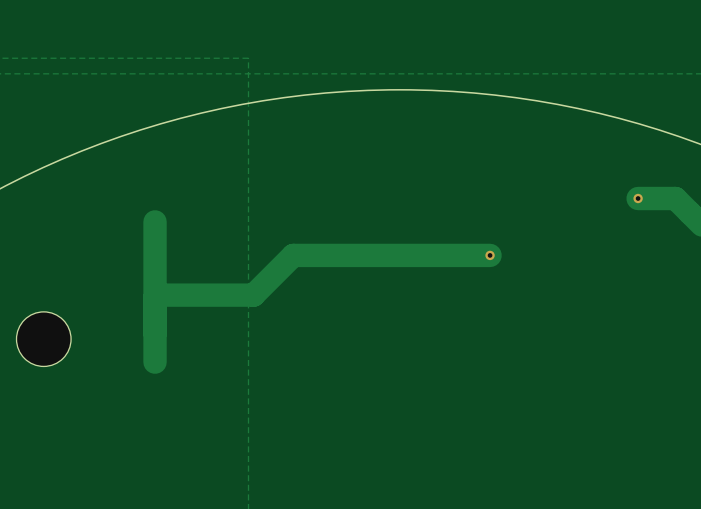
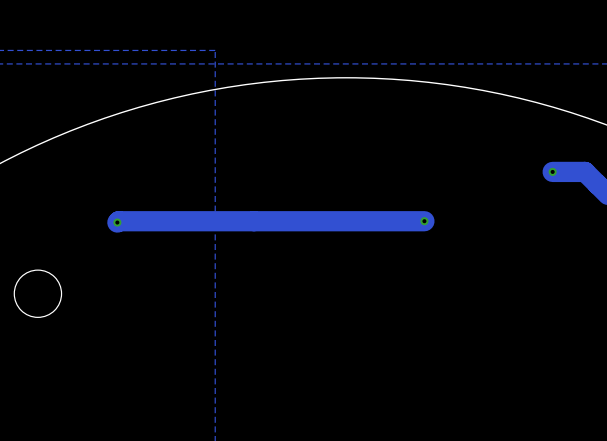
track: (155, 221) (155, 362) -> none
track: (293, 255) (253, 295) (157, 295) (155, 297) -> (253, 221) (117, 222)
via: none -> (117, 222)

